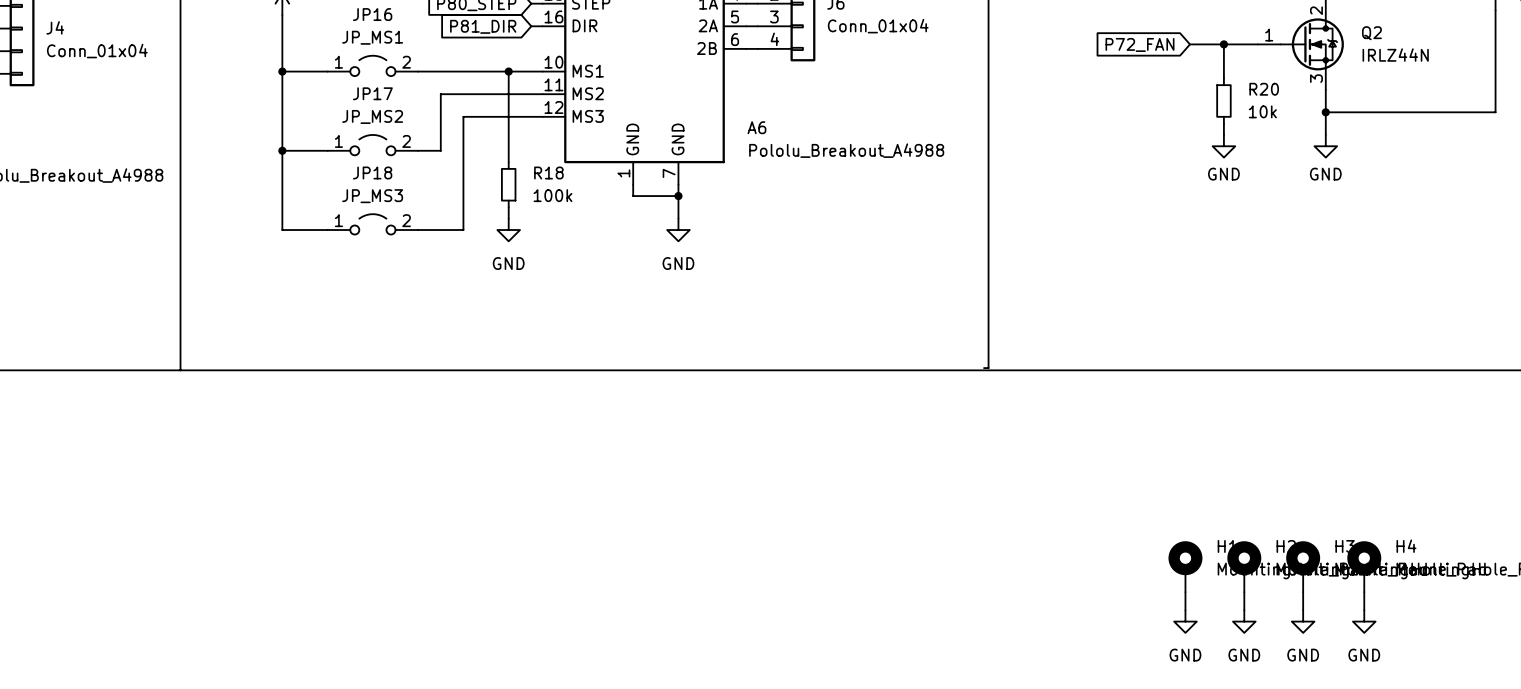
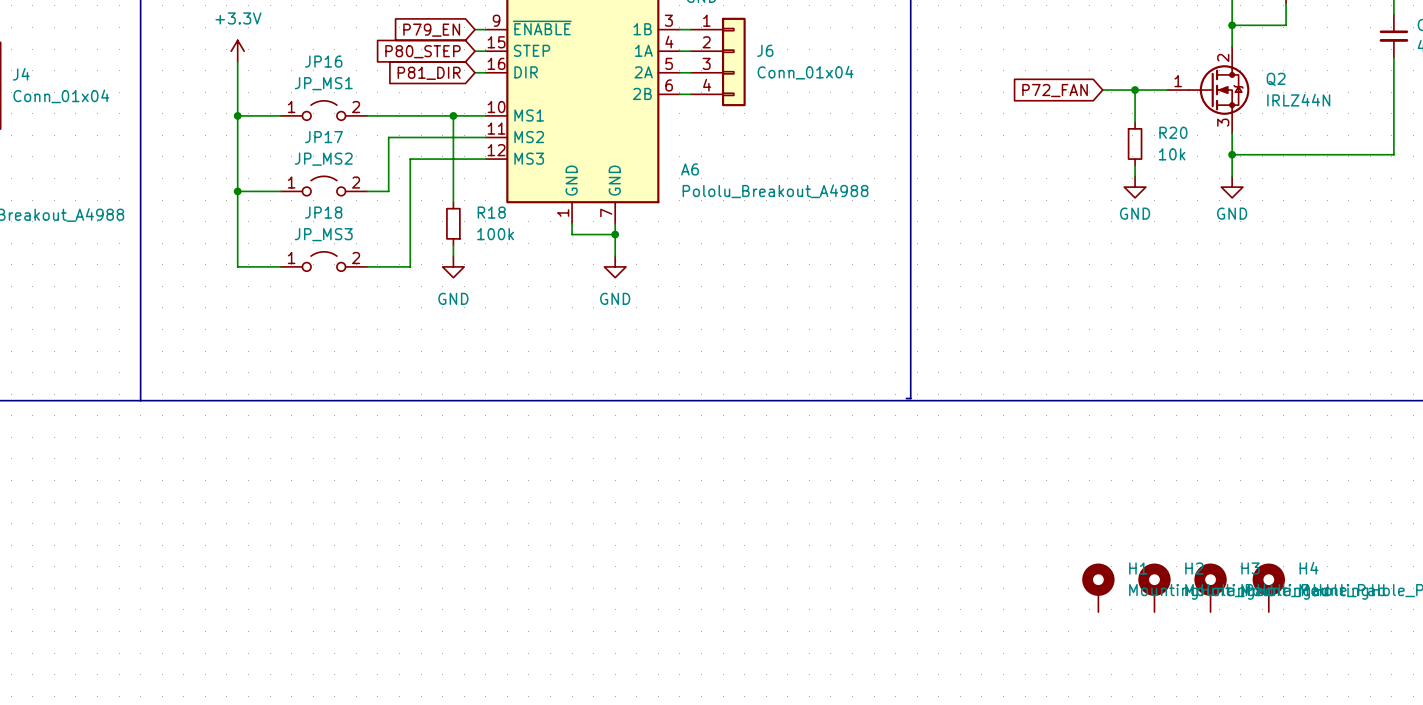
wire: (1185, 592) (1185, 610) -> none
wire: (1244, 592) (1244, 610) -> none
wire: (1303, 592) (1303, 610) -> none
wire: (1364, 592) (1364, 610) -> none
power symbol: GND (1185, 621) -> none
power symbol: GND (1244, 621) -> none
power symbol: GND (1303, 621) -> none
power symbol: GND (1364, 621) -> none

